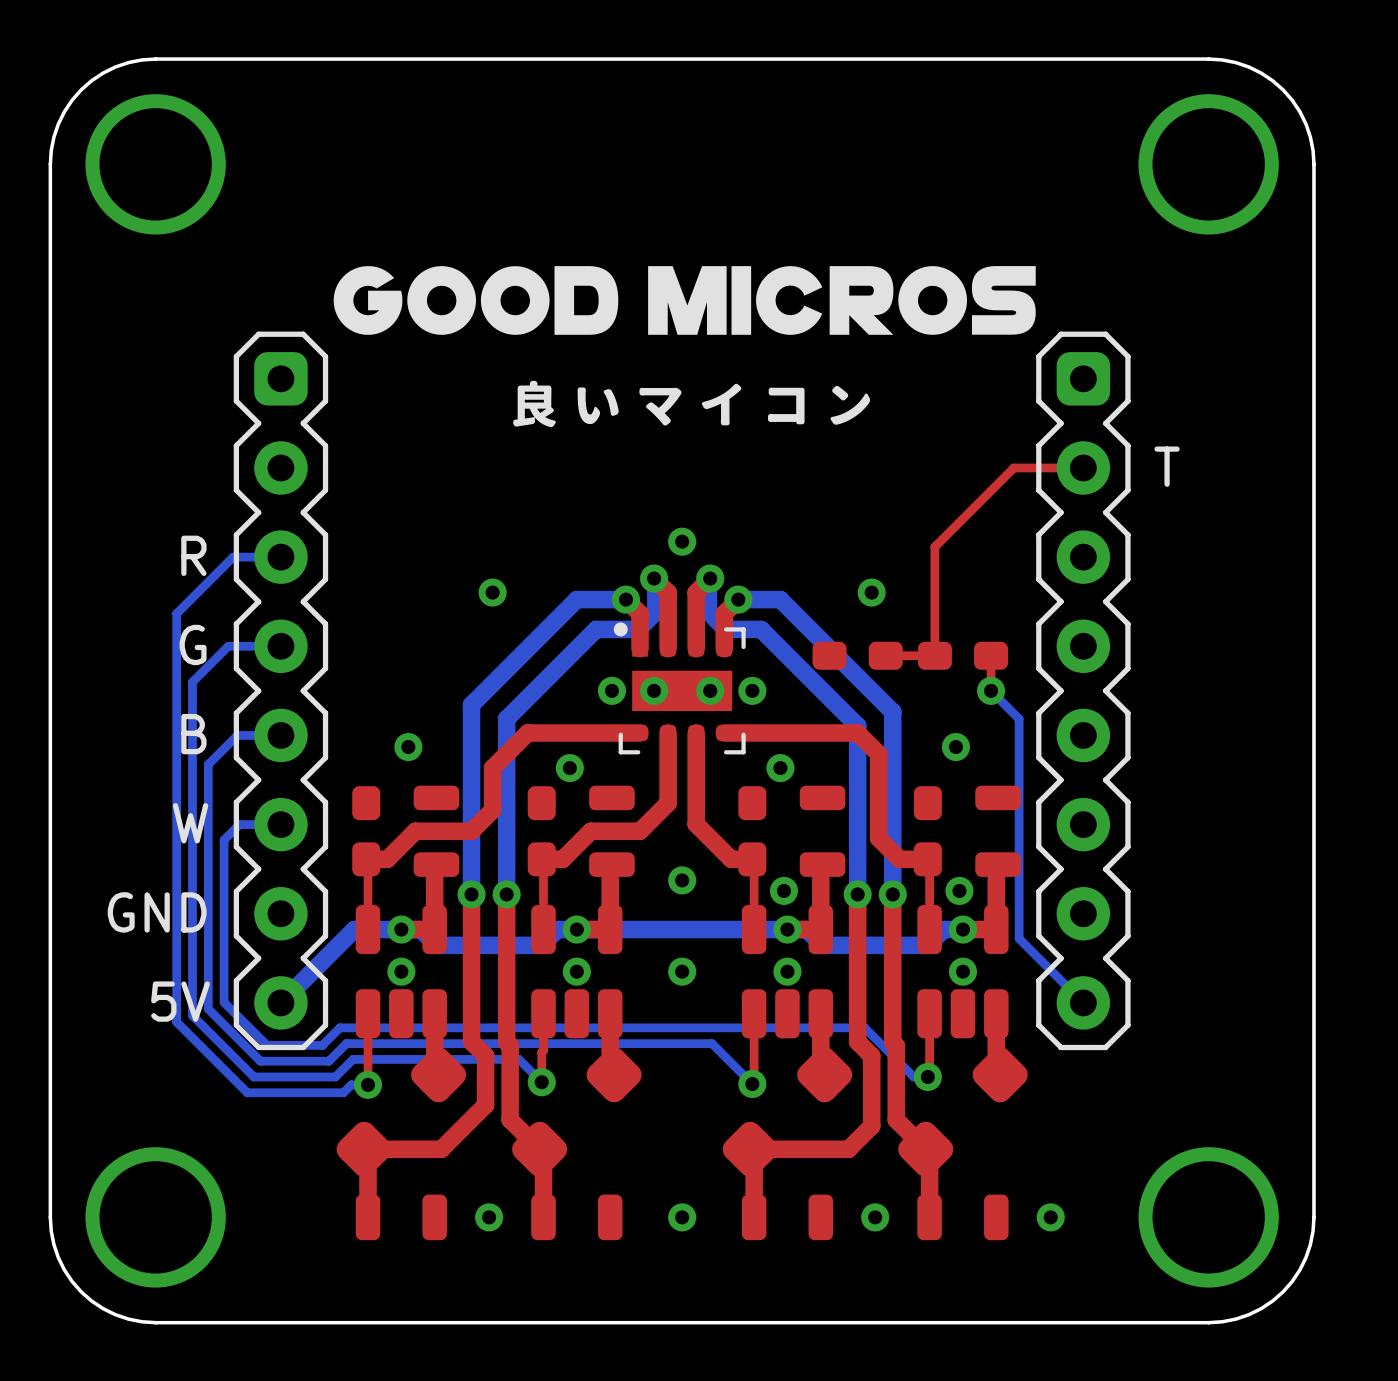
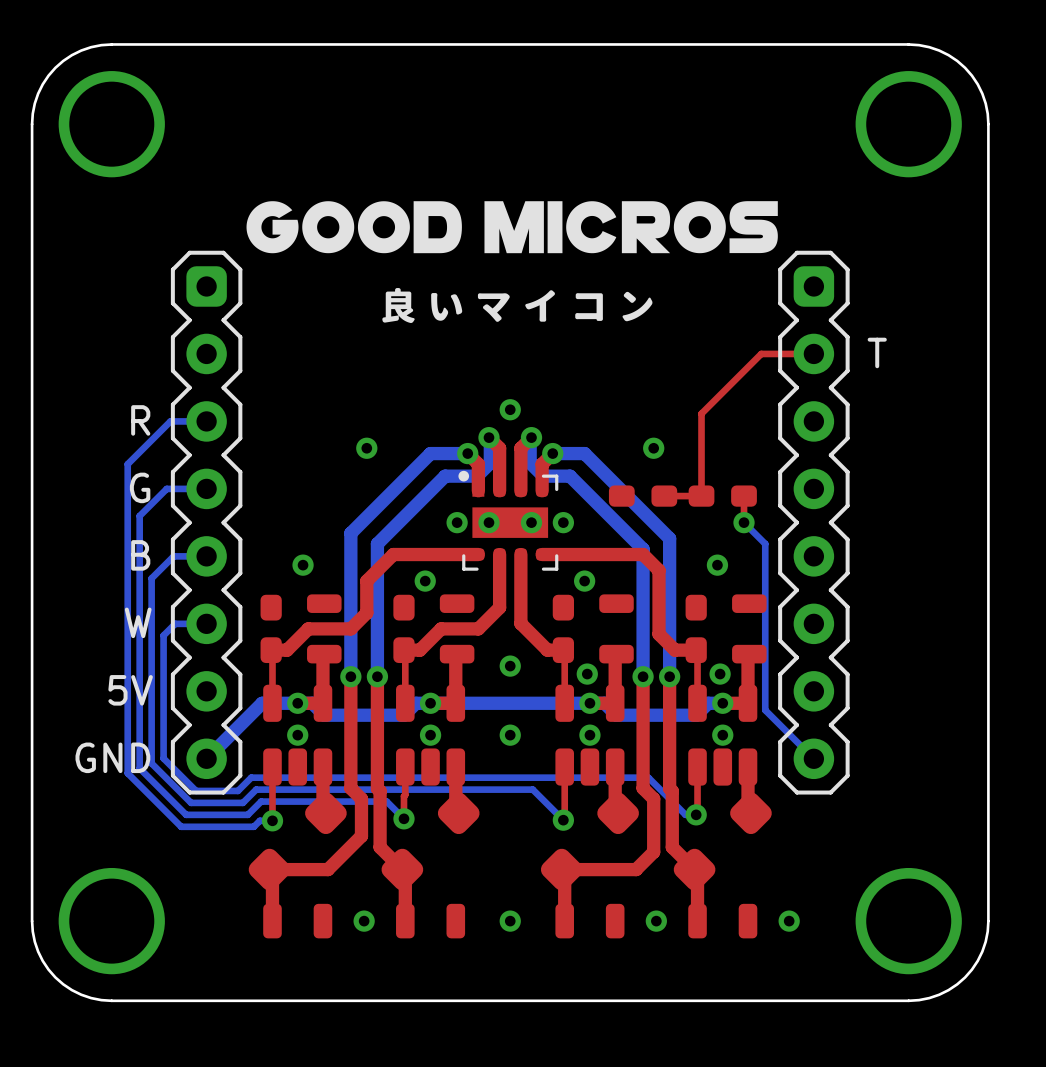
text: GND (157, 912) -> 5V (130, 690)
text: 5V (180, 1001) -> GND (112, 757)

